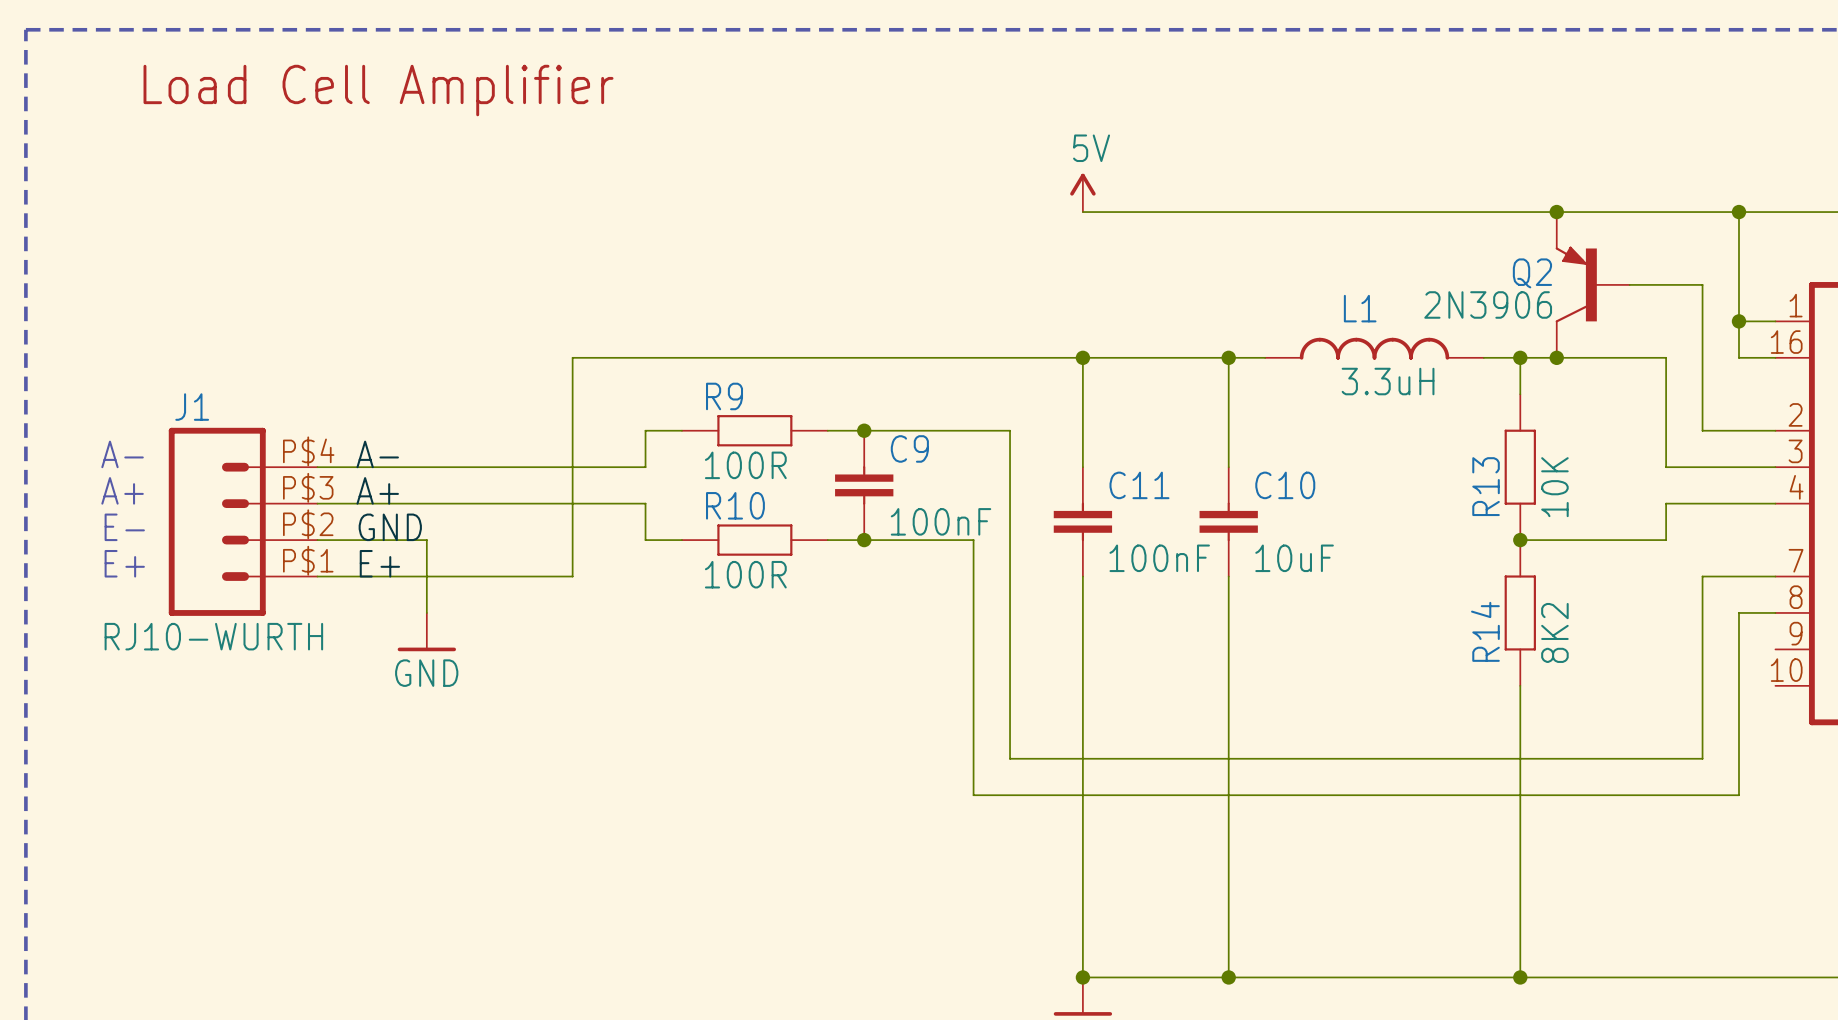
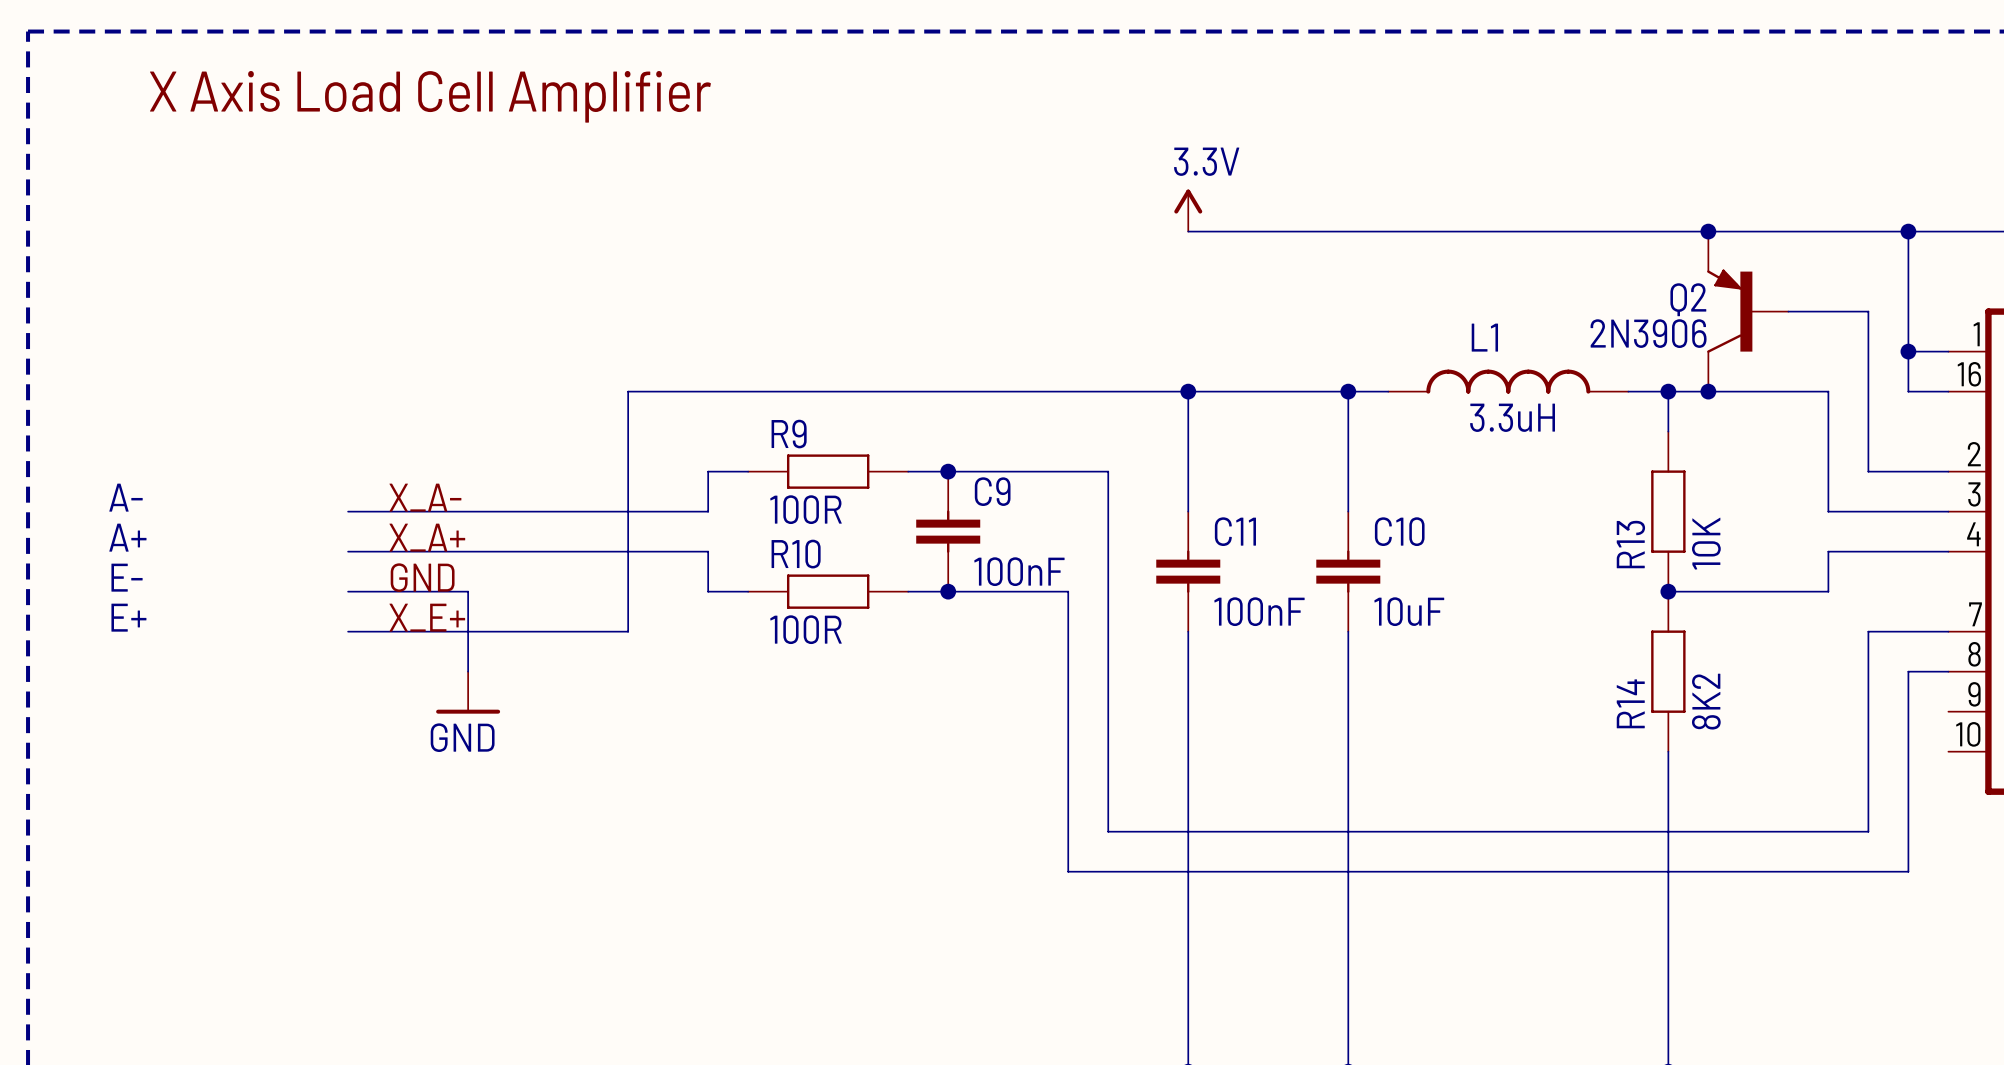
text: Load Cell Amplifier (378, 90) -> X Axis Load Cell Amplifier (430, 96)
power symbol: 5V (1082, 192) -> 3.3V (1188, 210)
label: A- (377, 454) -> X_A- (425, 497)
label: A+ (377, 490) -> X_A+ (427, 537)
J1: RJ10-WURTH (243, 521) -> none
label: E+ (379, 563) -> X_E+ (427, 617)

